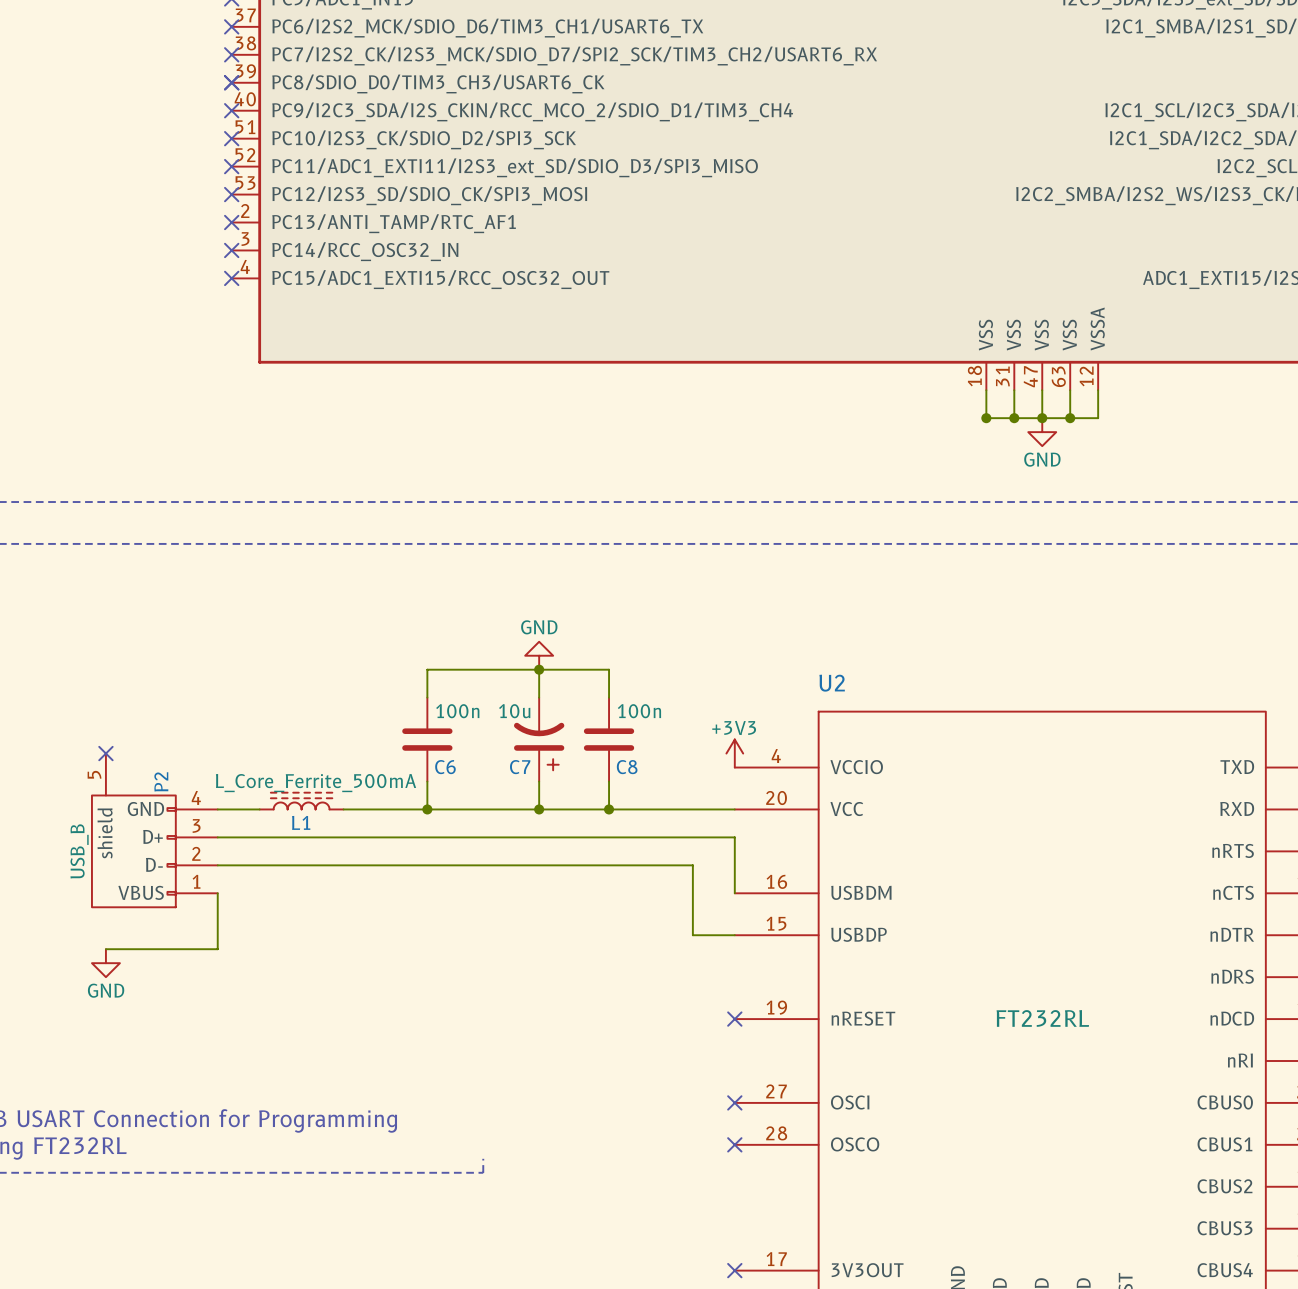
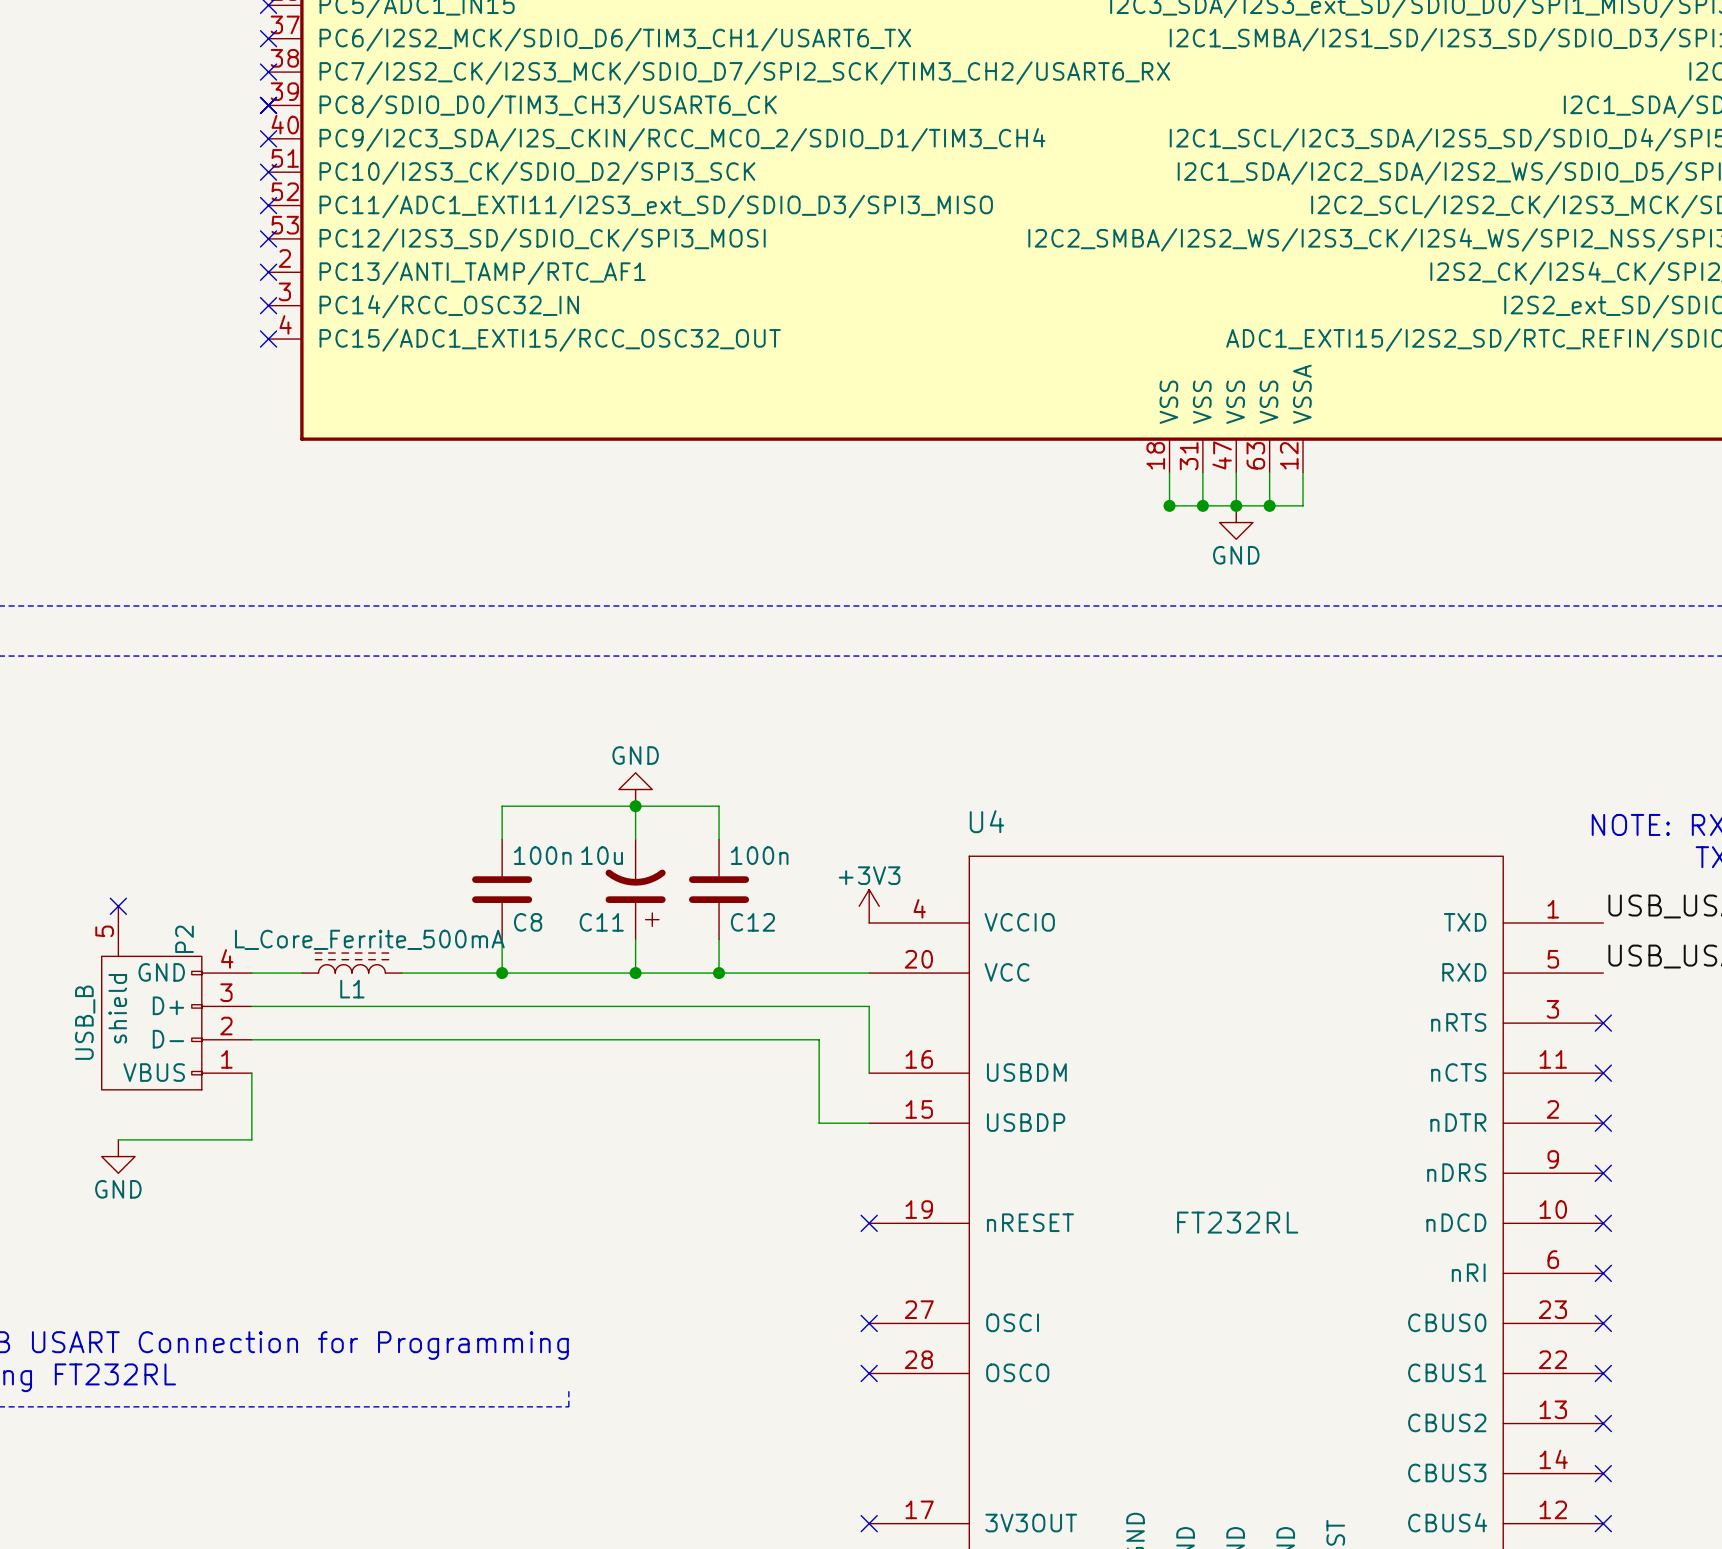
U2 name: U2 (832, 683) -> U4 (986, 821)
C6 name: C6 (445, 767) -> C8 (528, 922)
C7 name: C7 (520, 767) -> C11 (601, 922)
C8 name: C8 (627, 767) -> C12 (752, 922)

